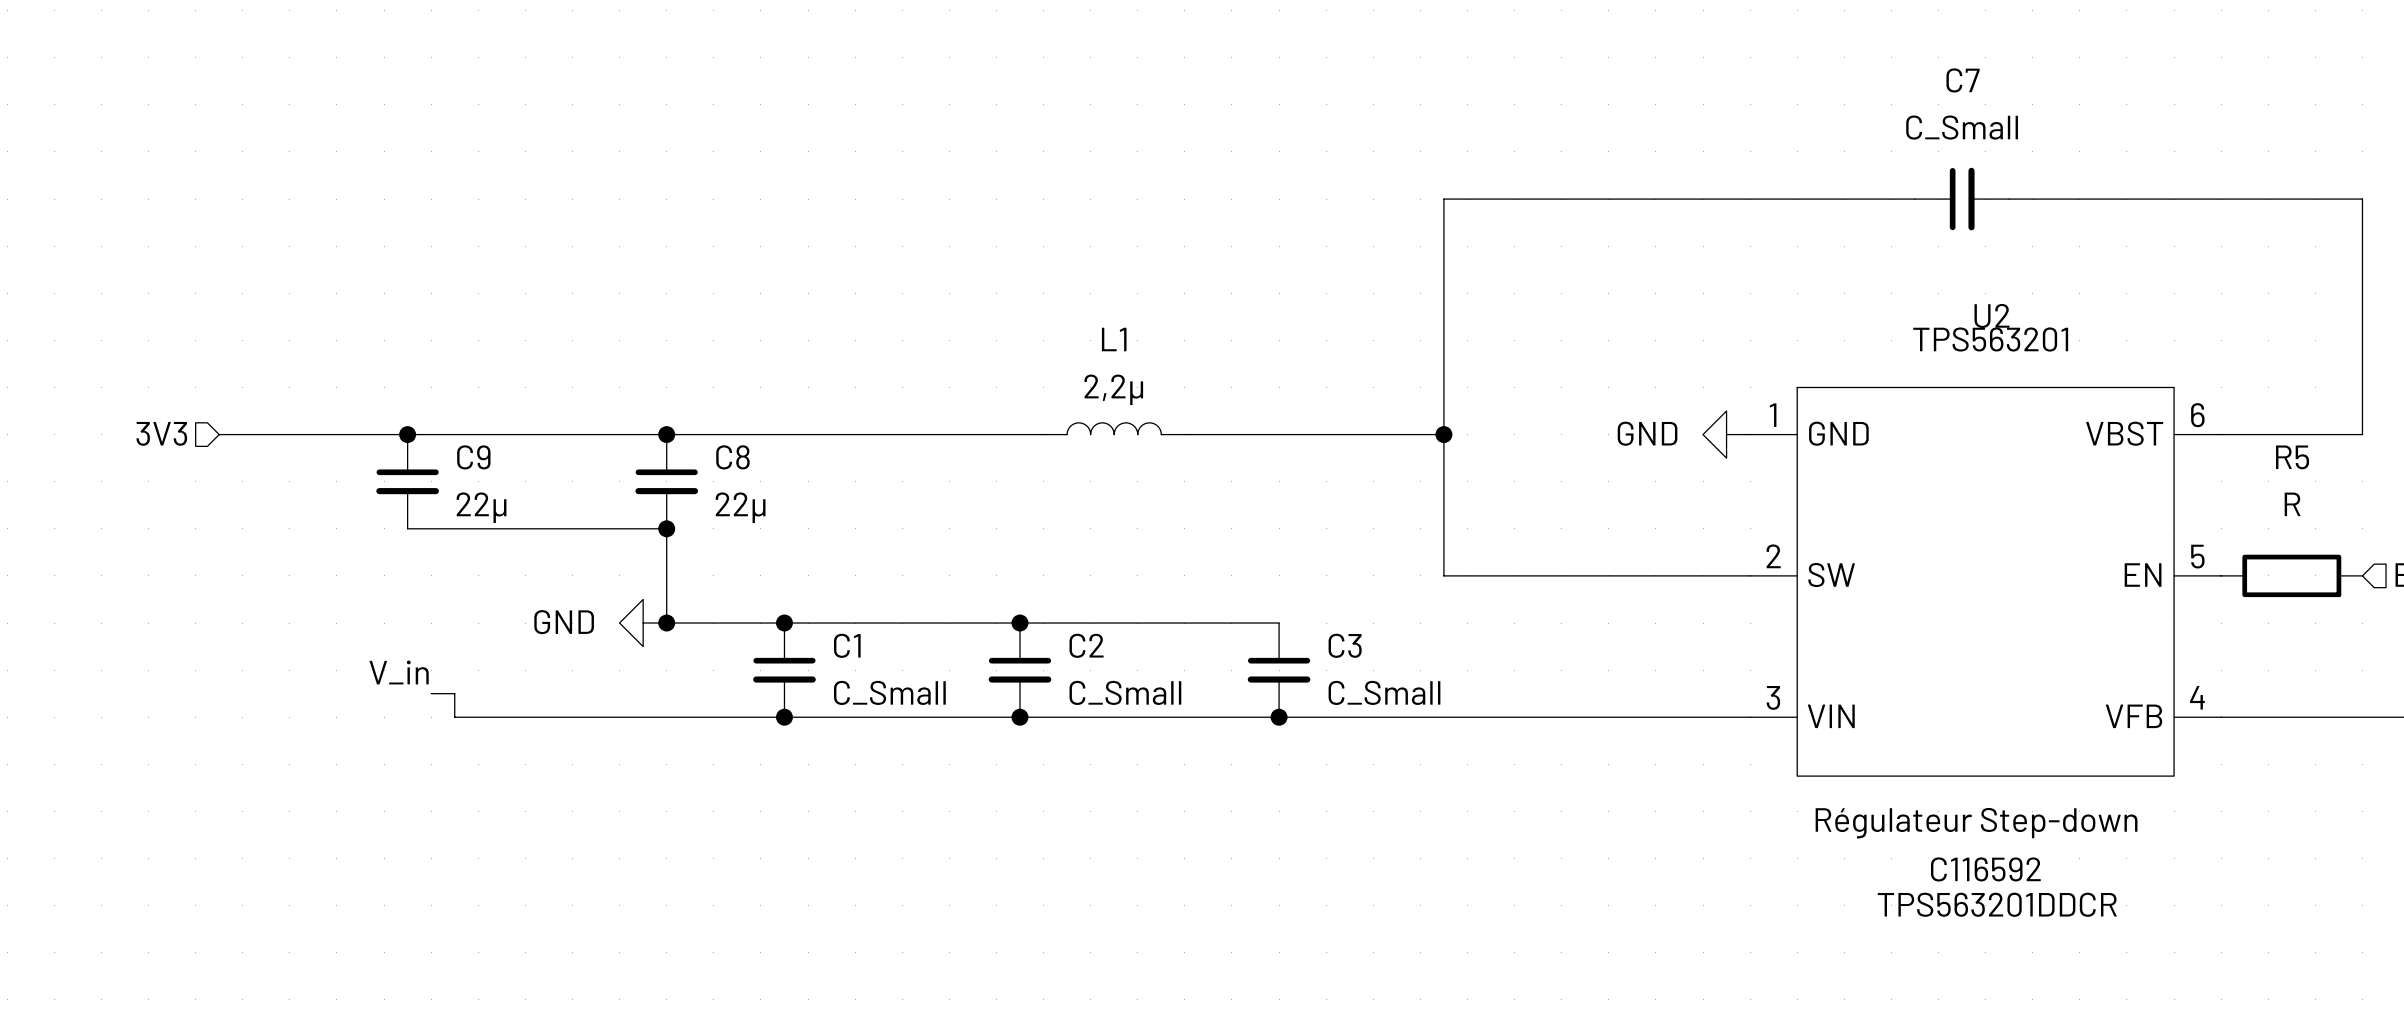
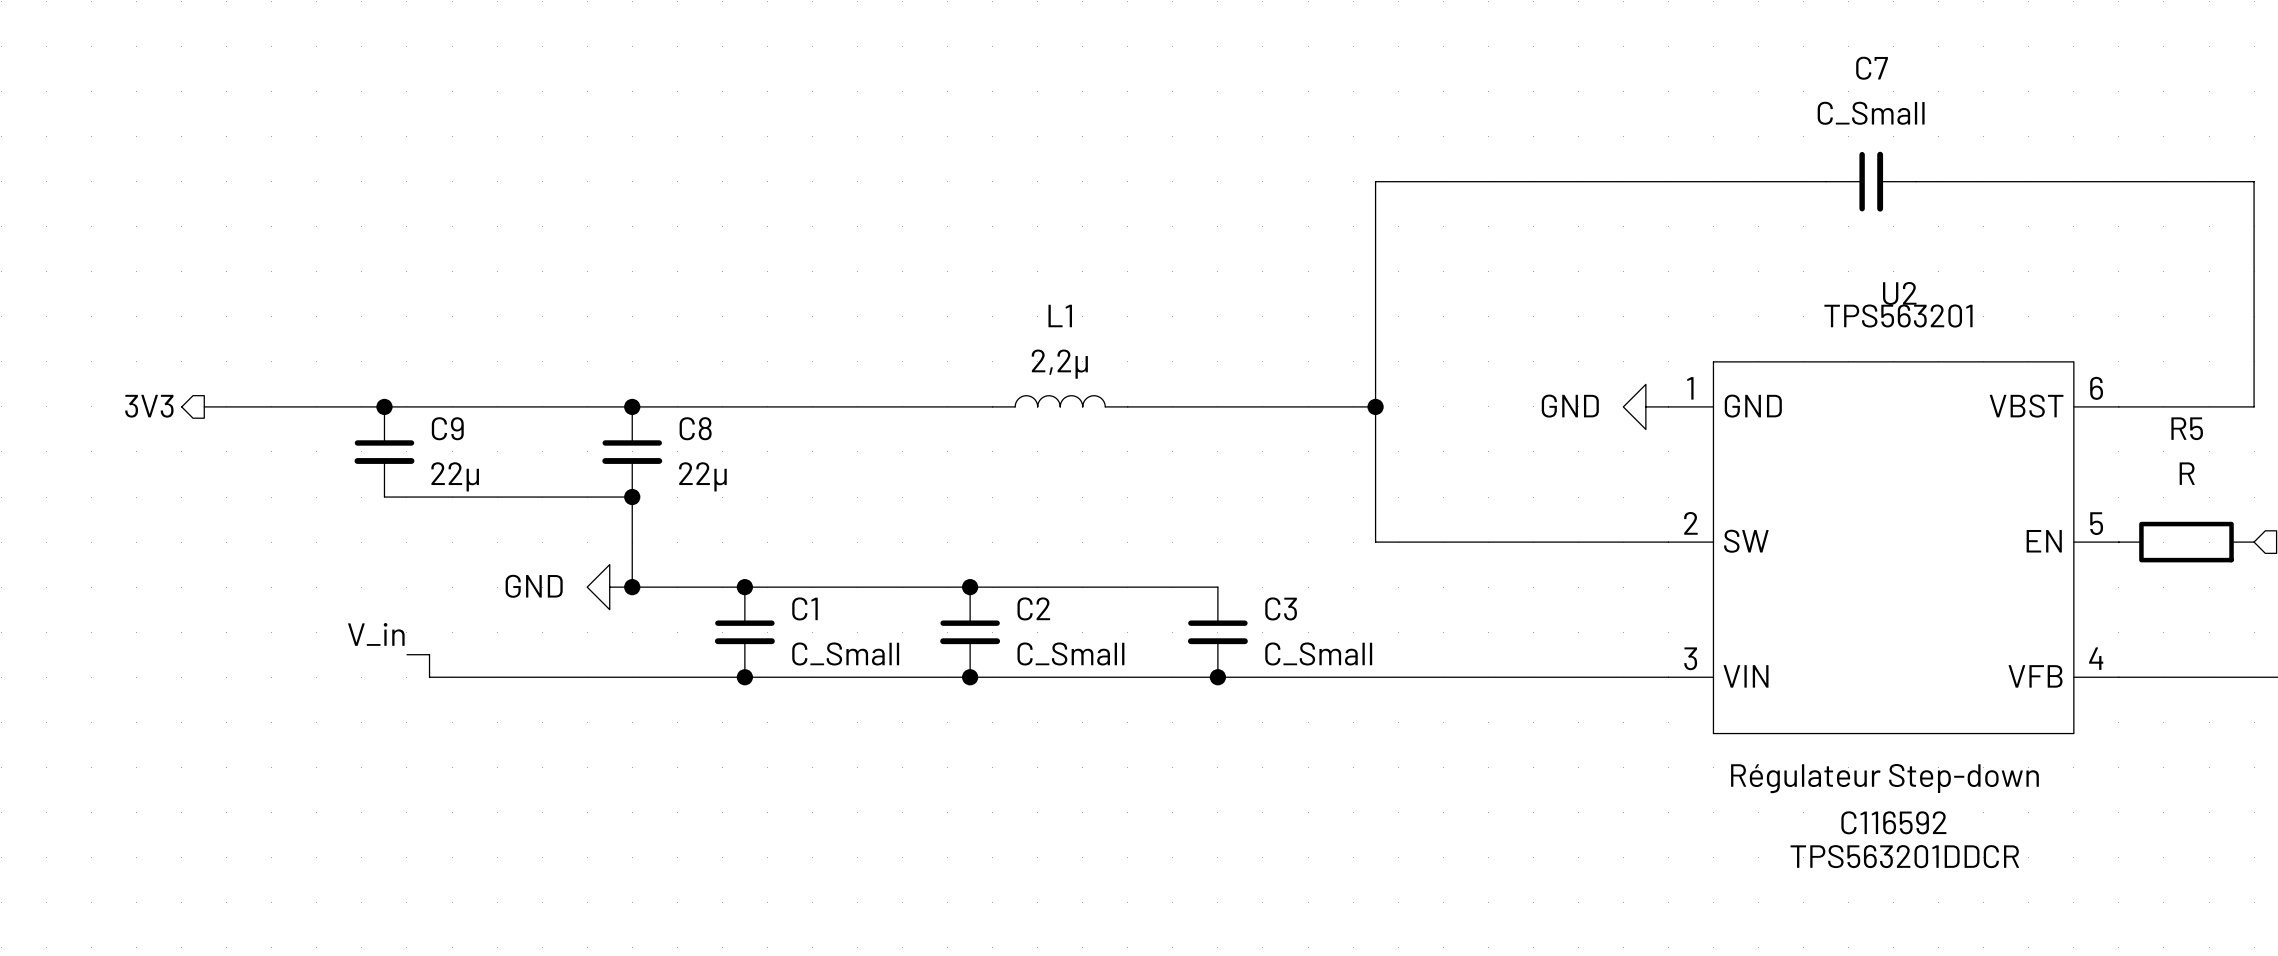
hierarchical label shape: input (161, 433) -> output (149, 406)

